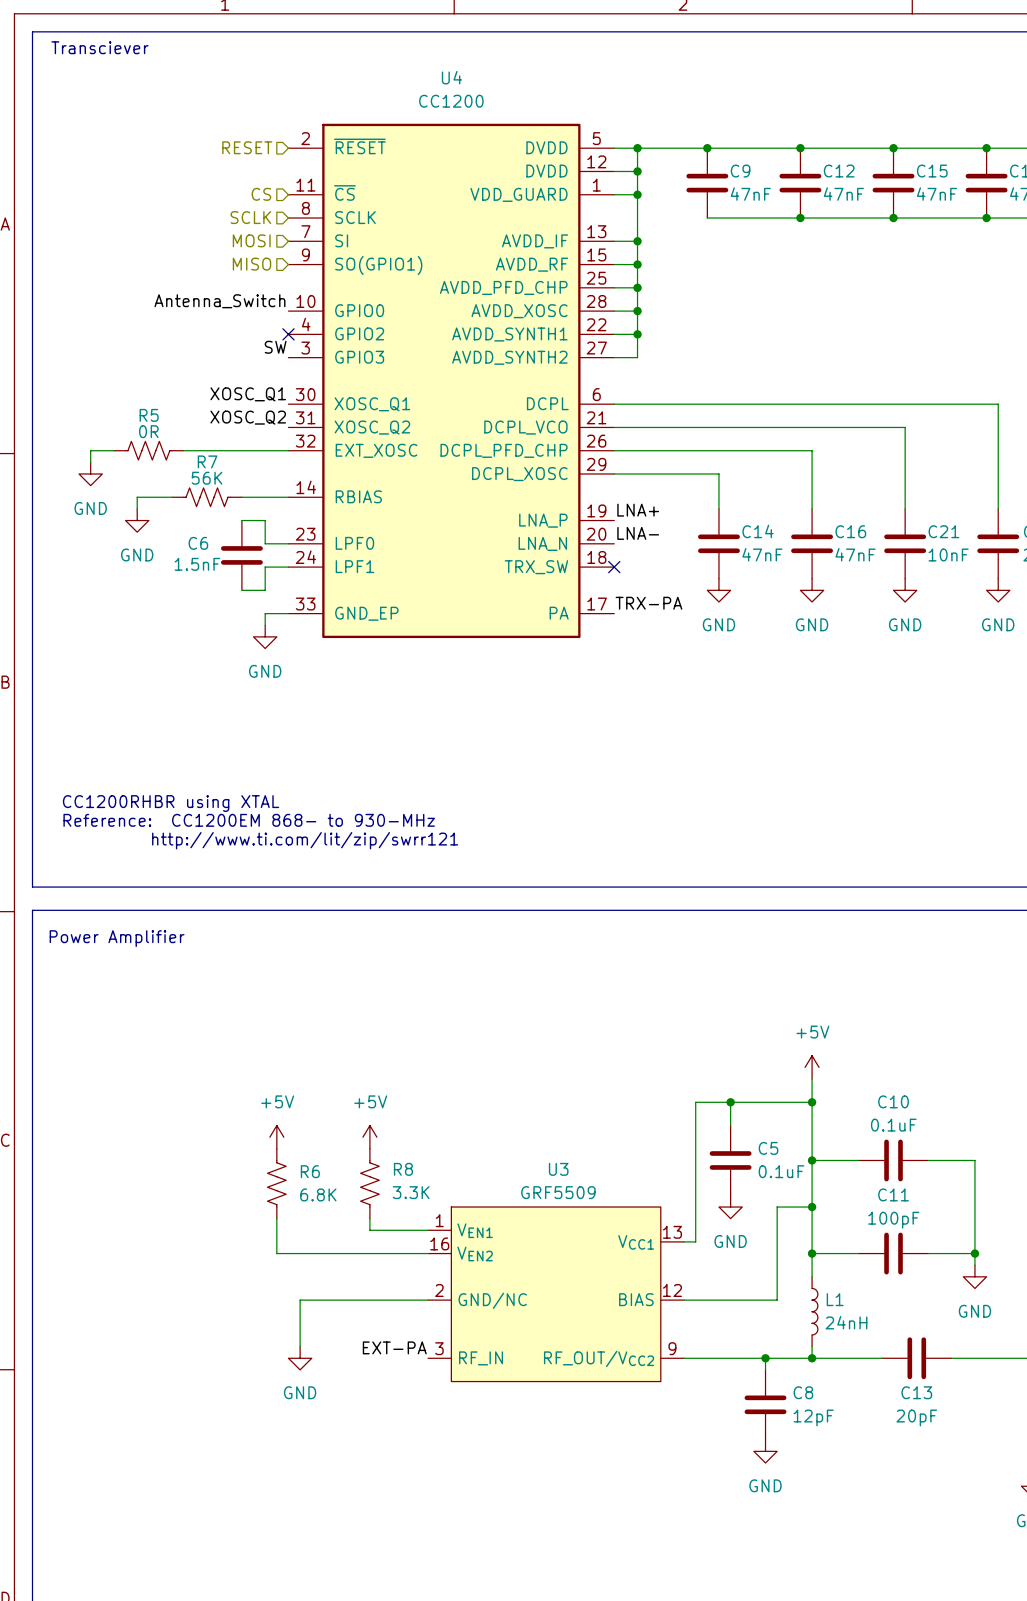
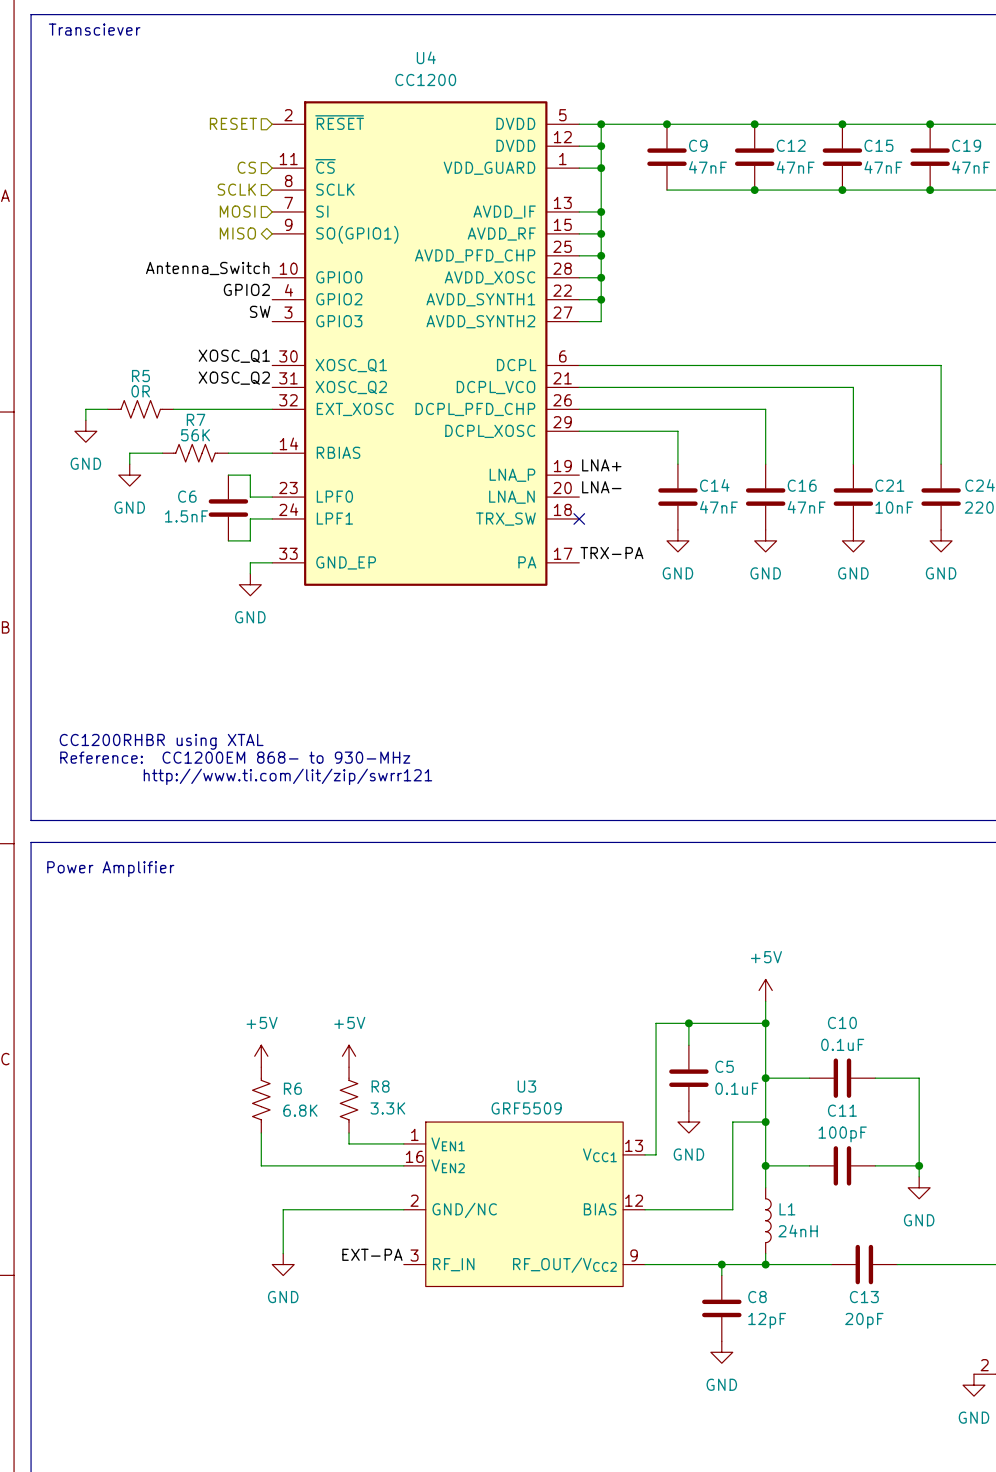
hierarchical label shape: input (252, 264) -> bidirectional (237, 233)
label: none -> GPIO2 (246, 289)
no-connect mark: (288, 334) -> none

